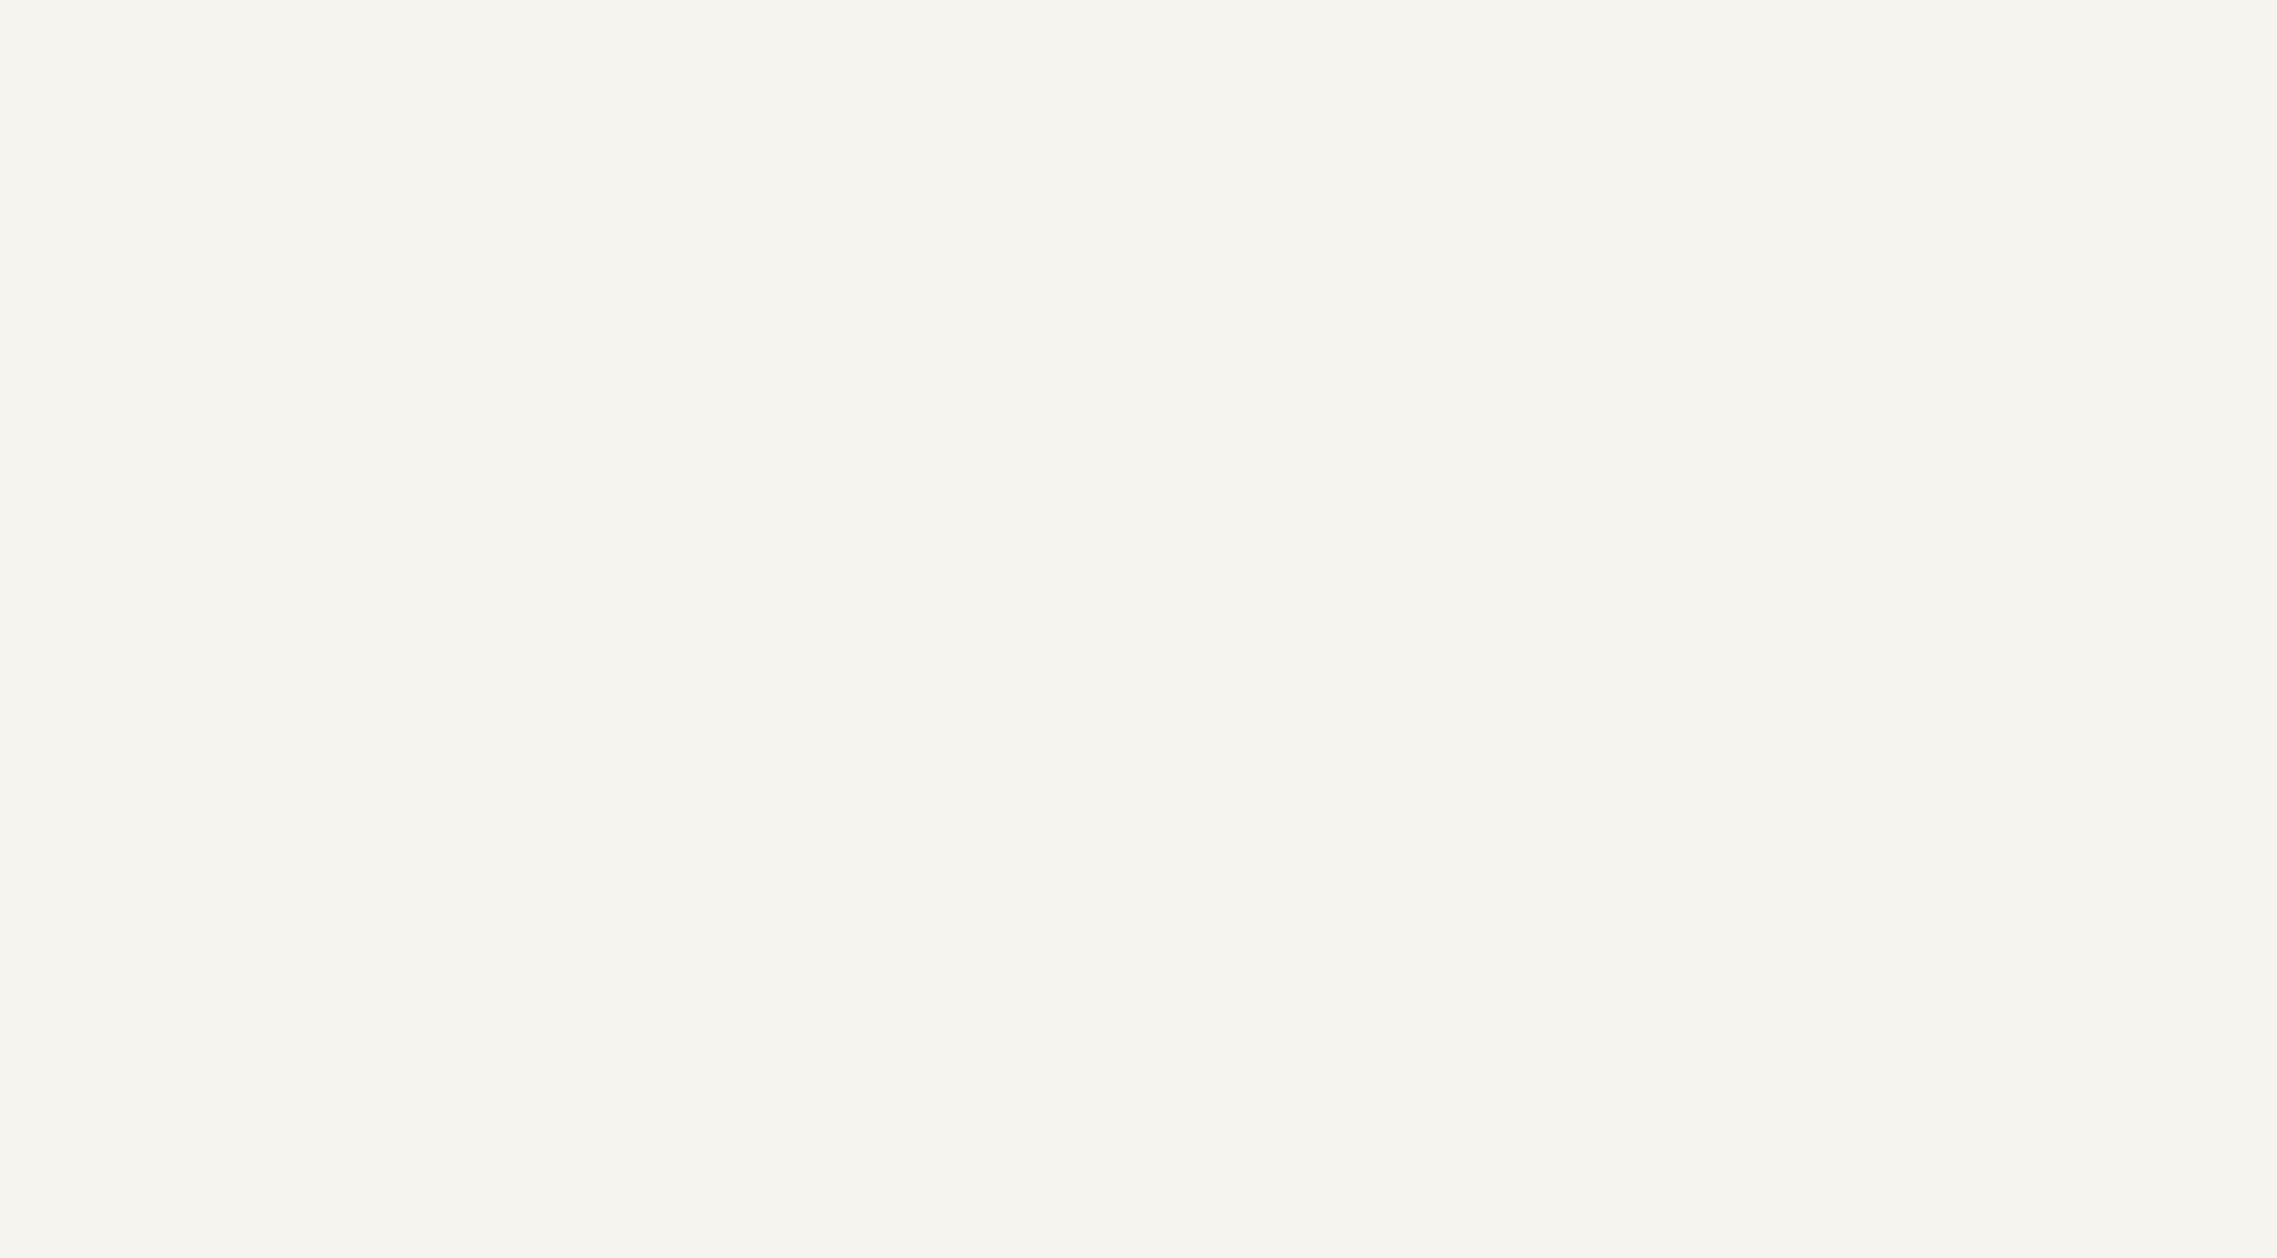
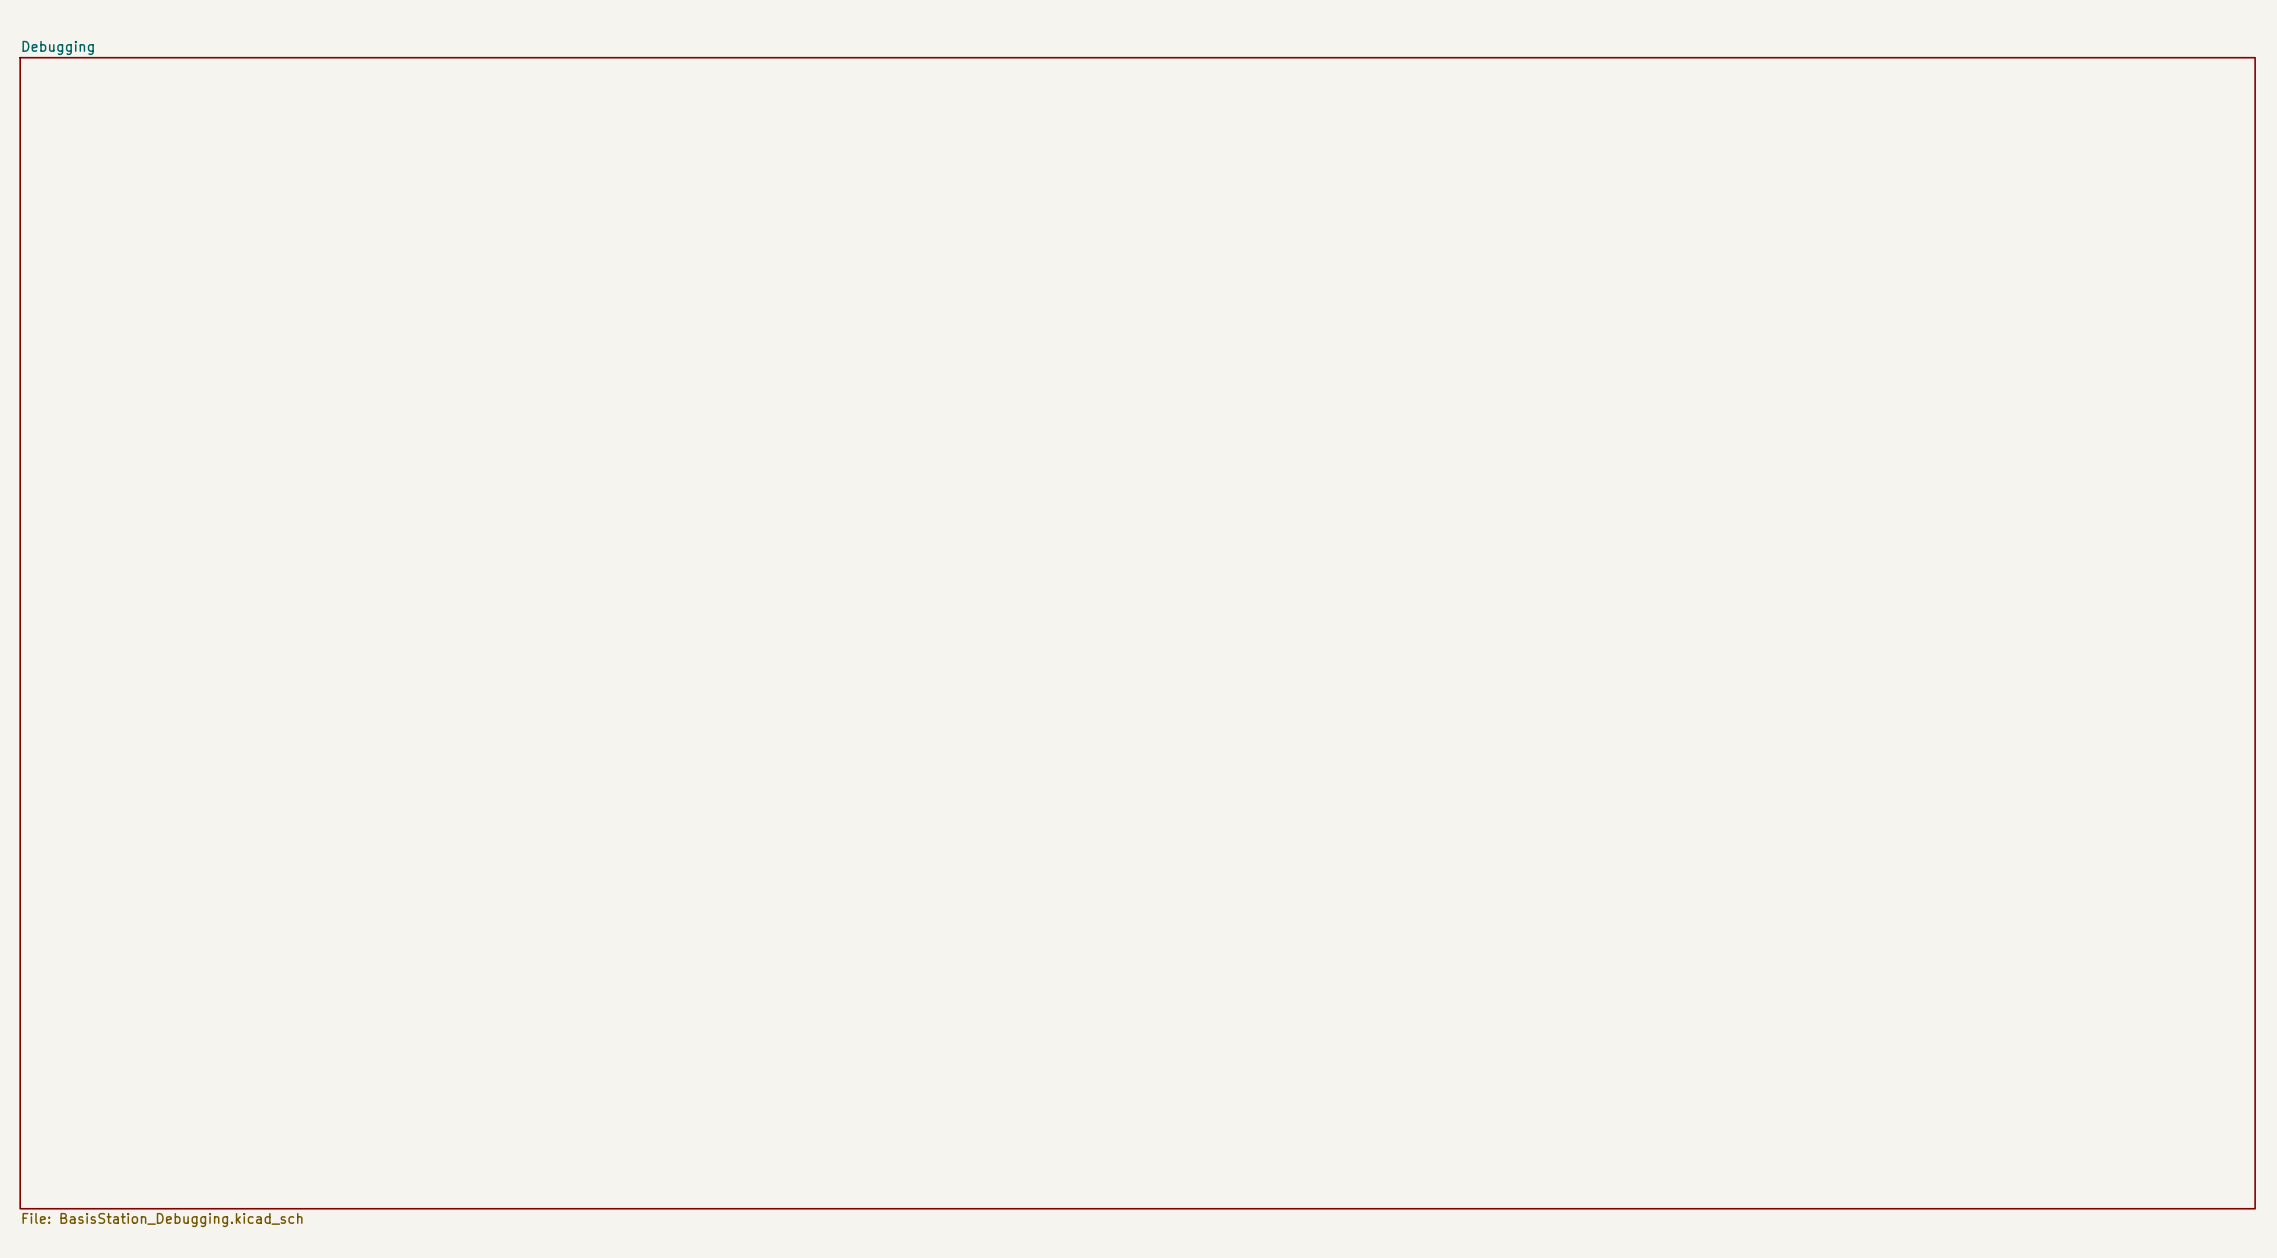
sheet Debugging: none -> File: BasisStation_Debugging.kicad_sch (1137, 633)

